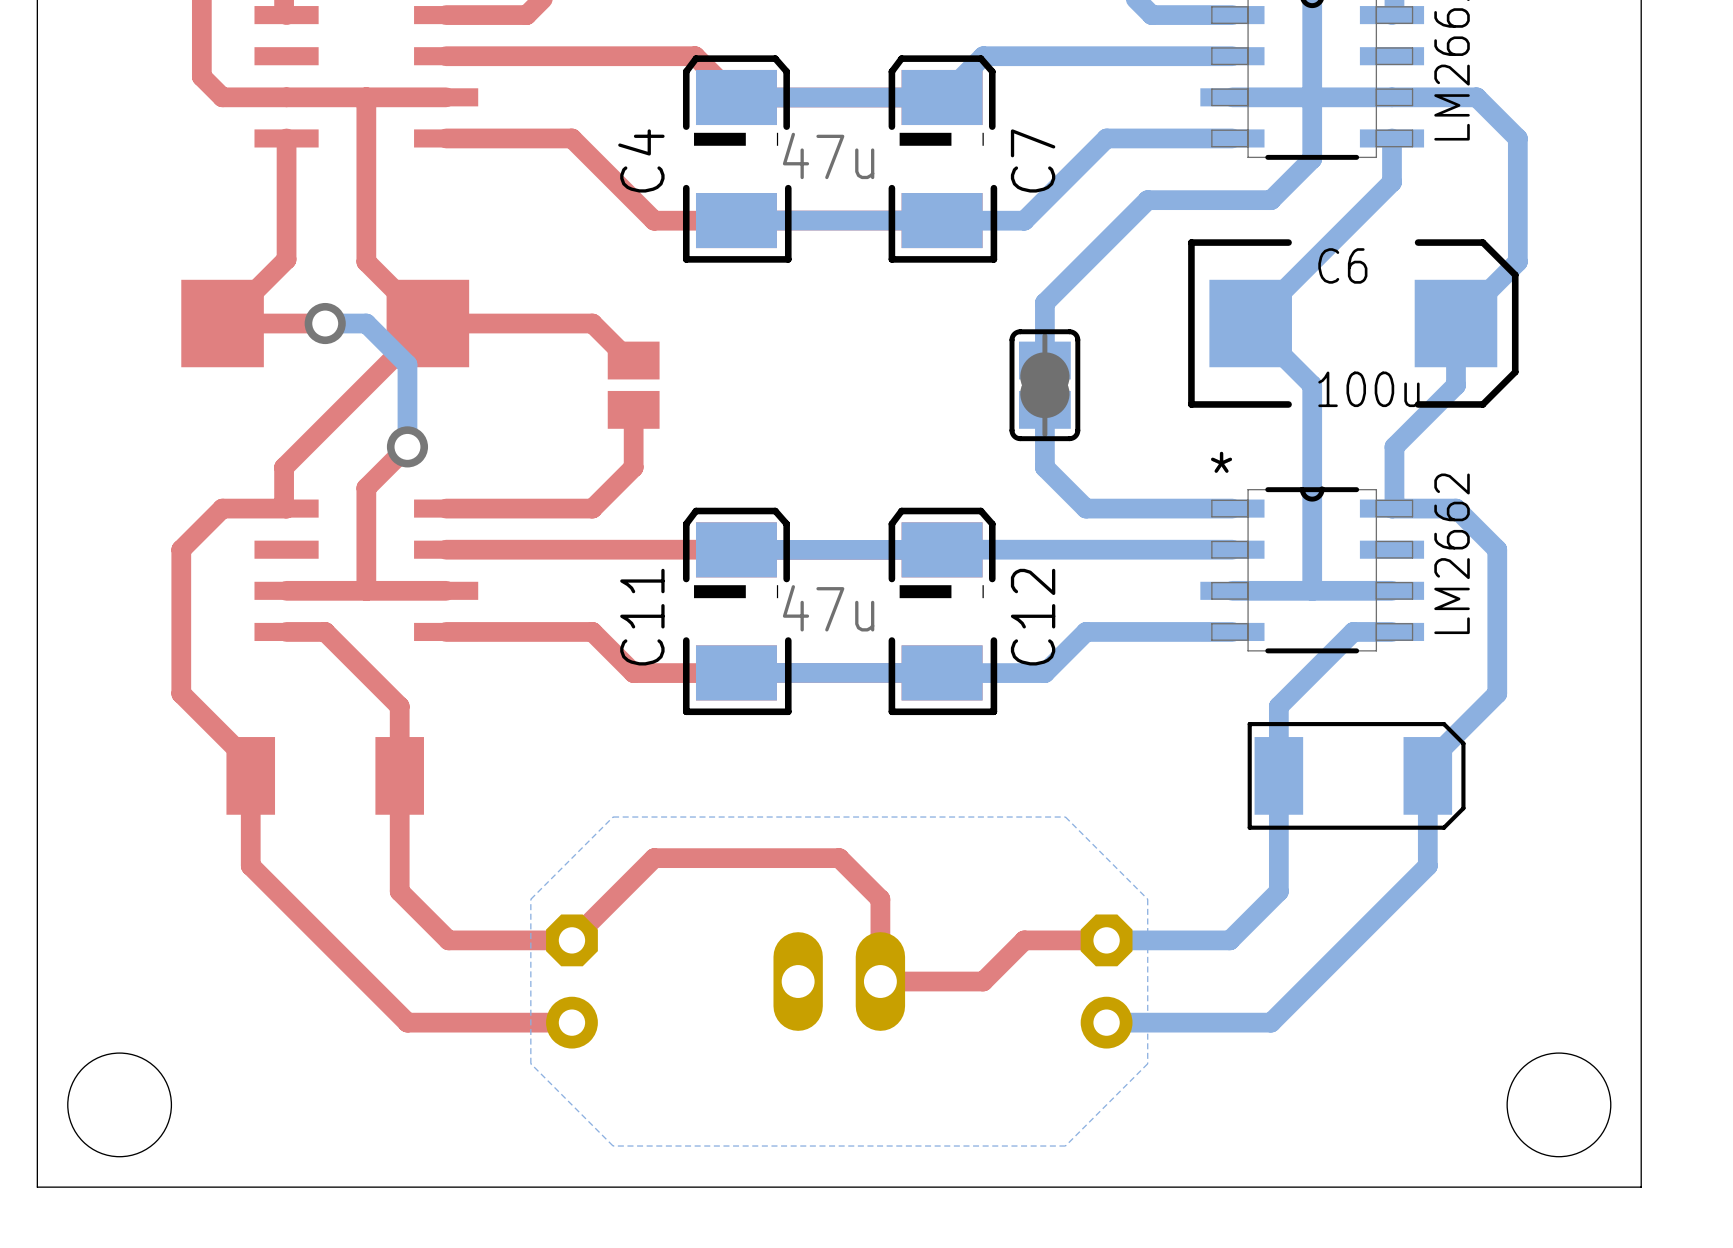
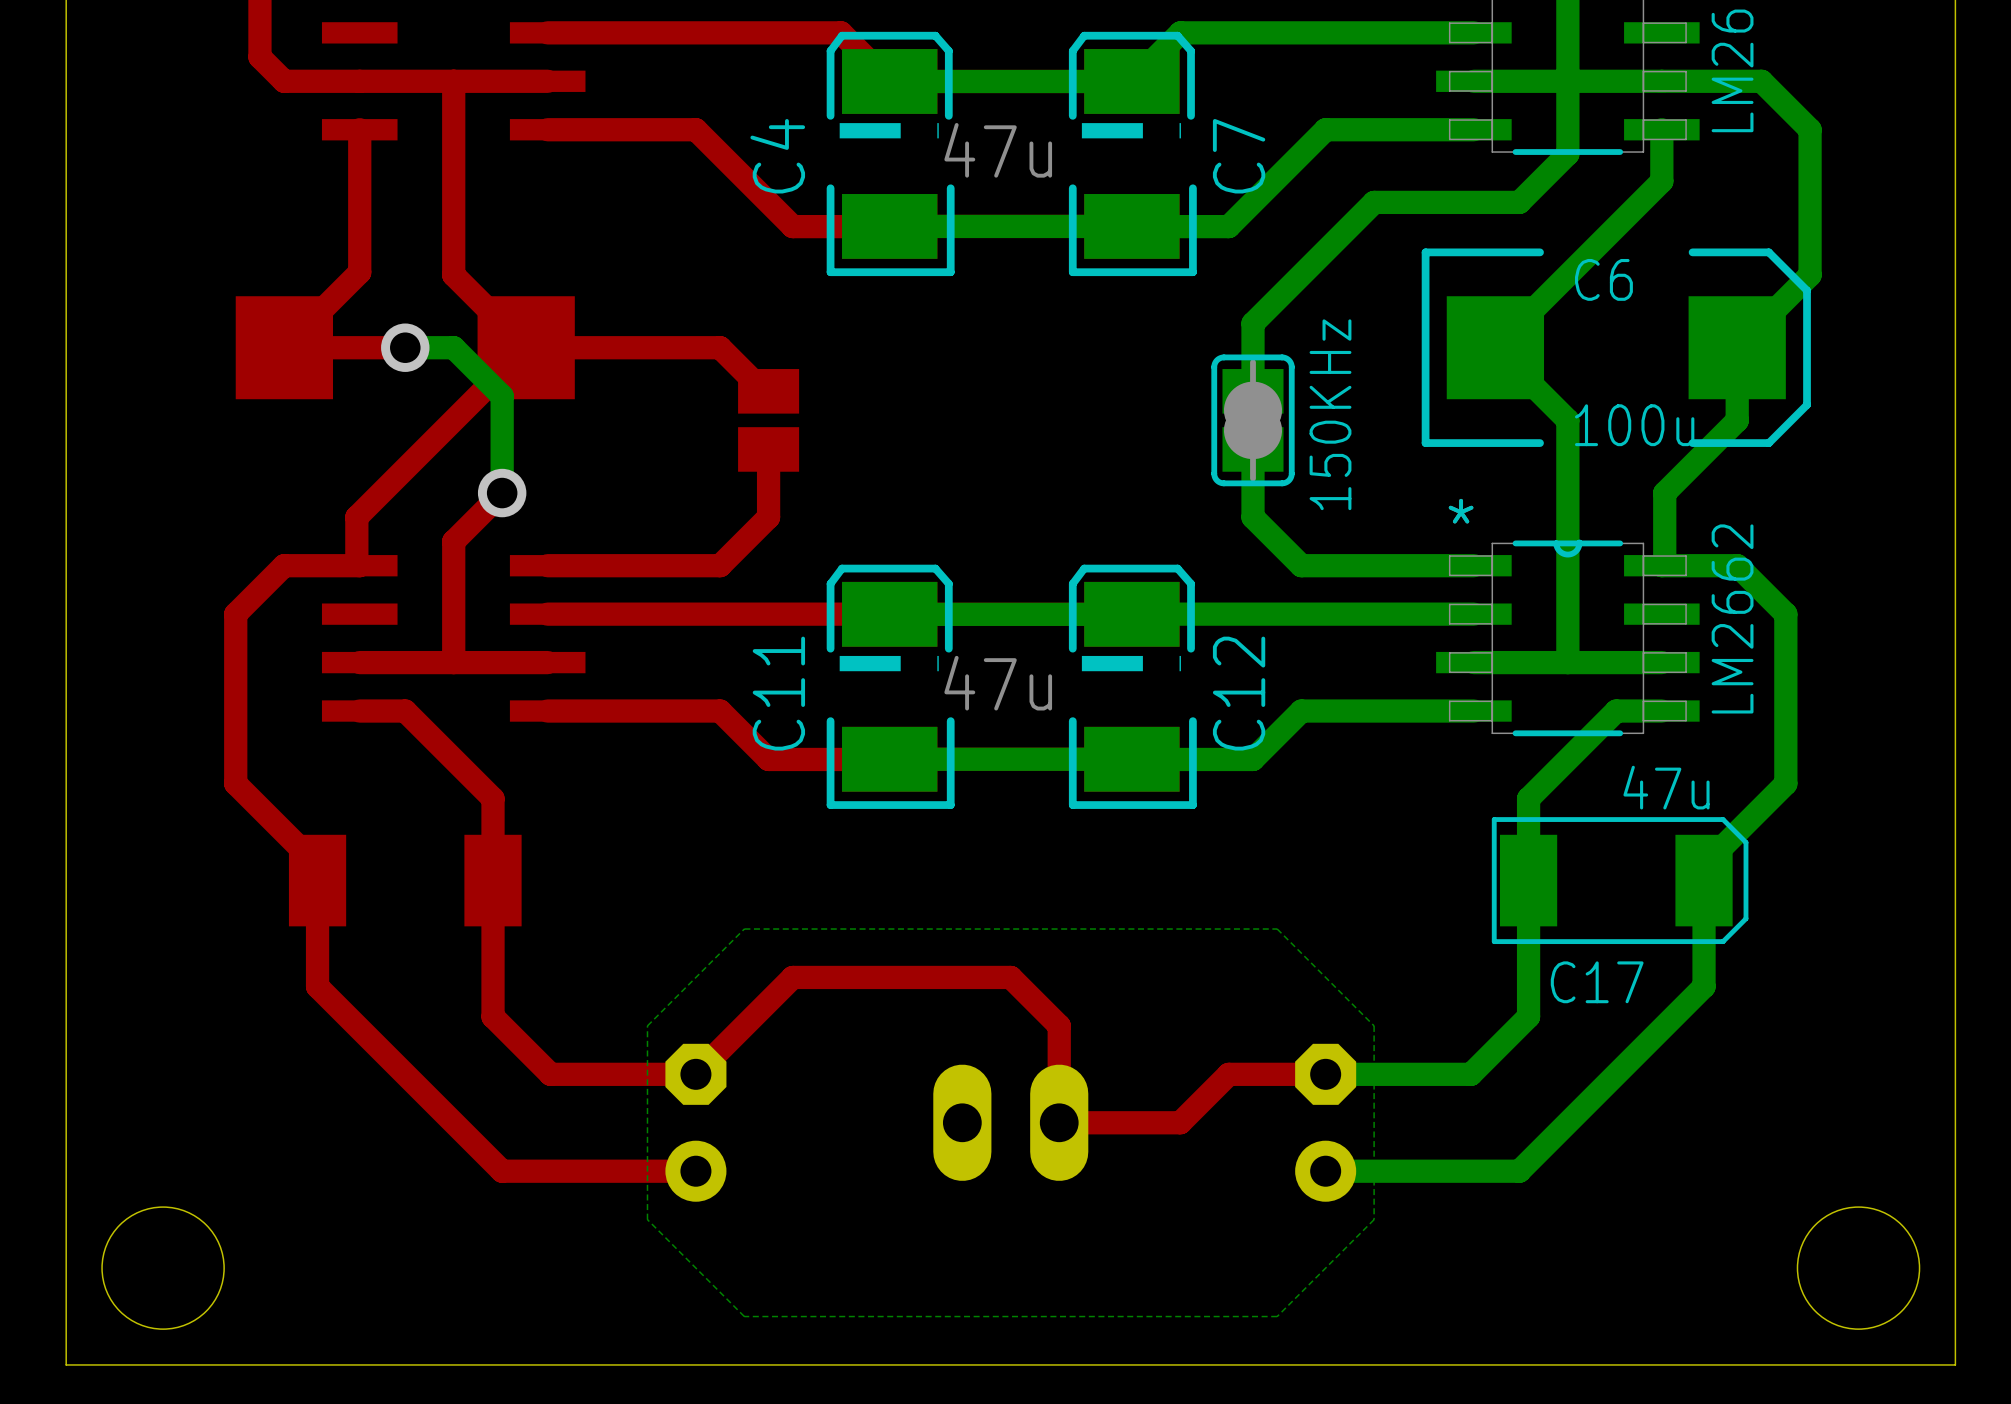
text: none -> 150KHz (1330, 414)
text: none -> 47u (1666, 787)
text: none -> C17 (1597, 982)

